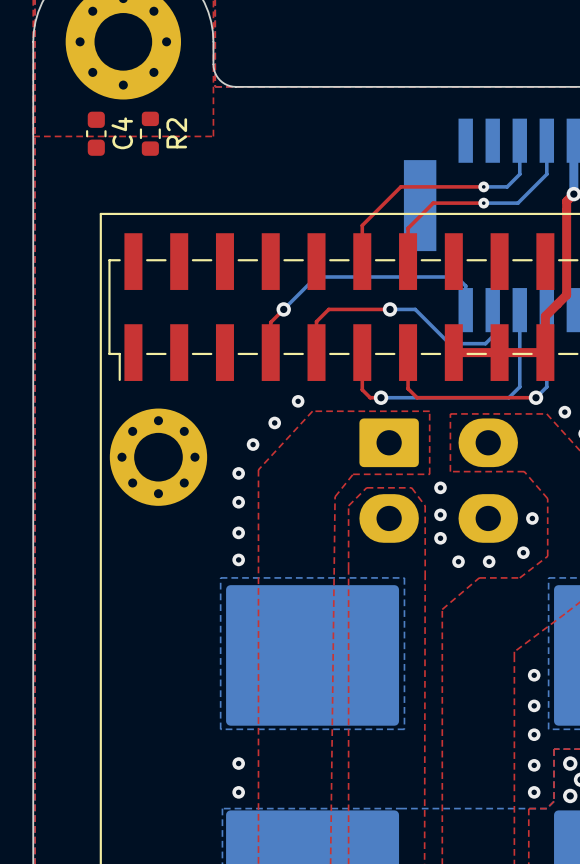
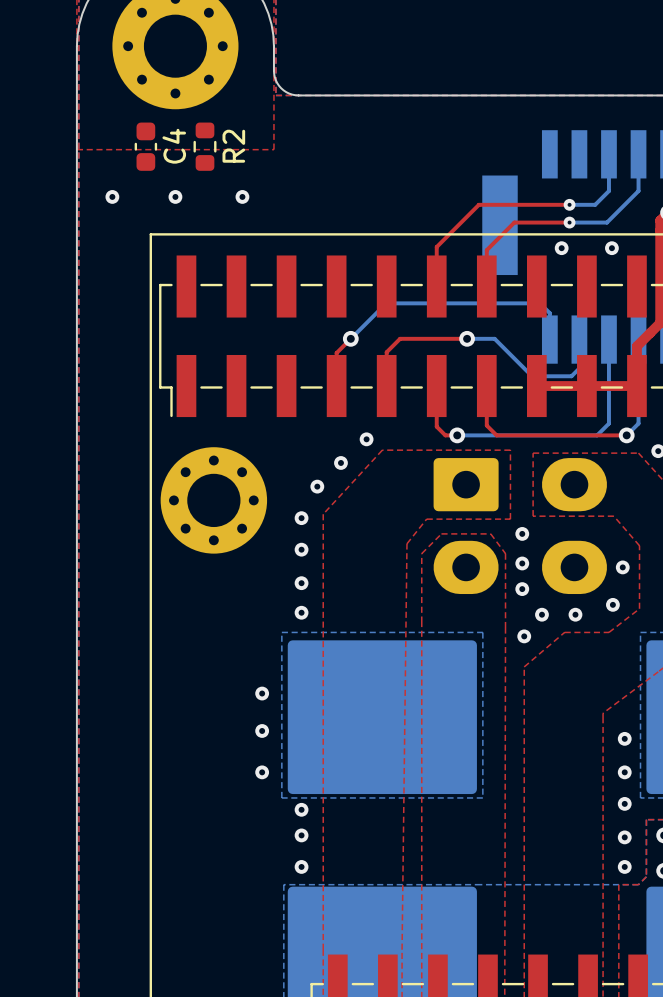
via: none -> (112, 196)
via: none -> (175, 196)
via: none -> (242, 196)
via: none -> (561, 248)
via: none -> (611, 248)
via: none -> (524, 636)
via: none -> (262, 693)
via: none -> (262, 730)
via: none -> (262, 772)
via: none -> (301, 809)

